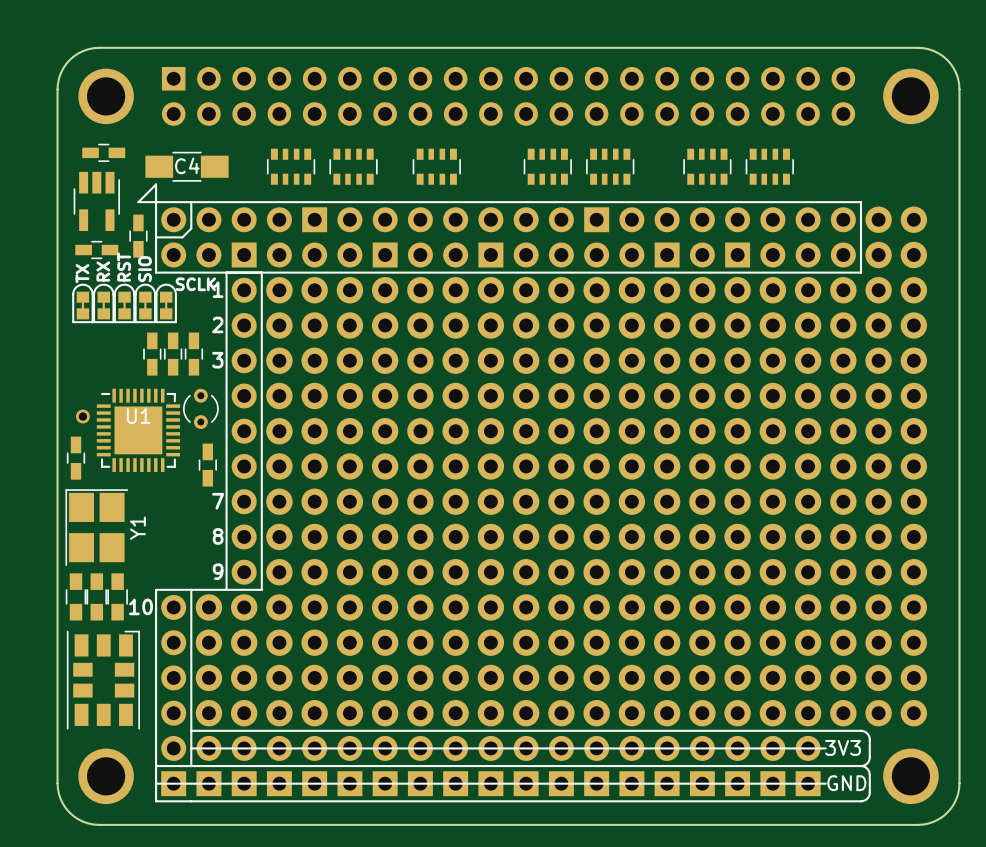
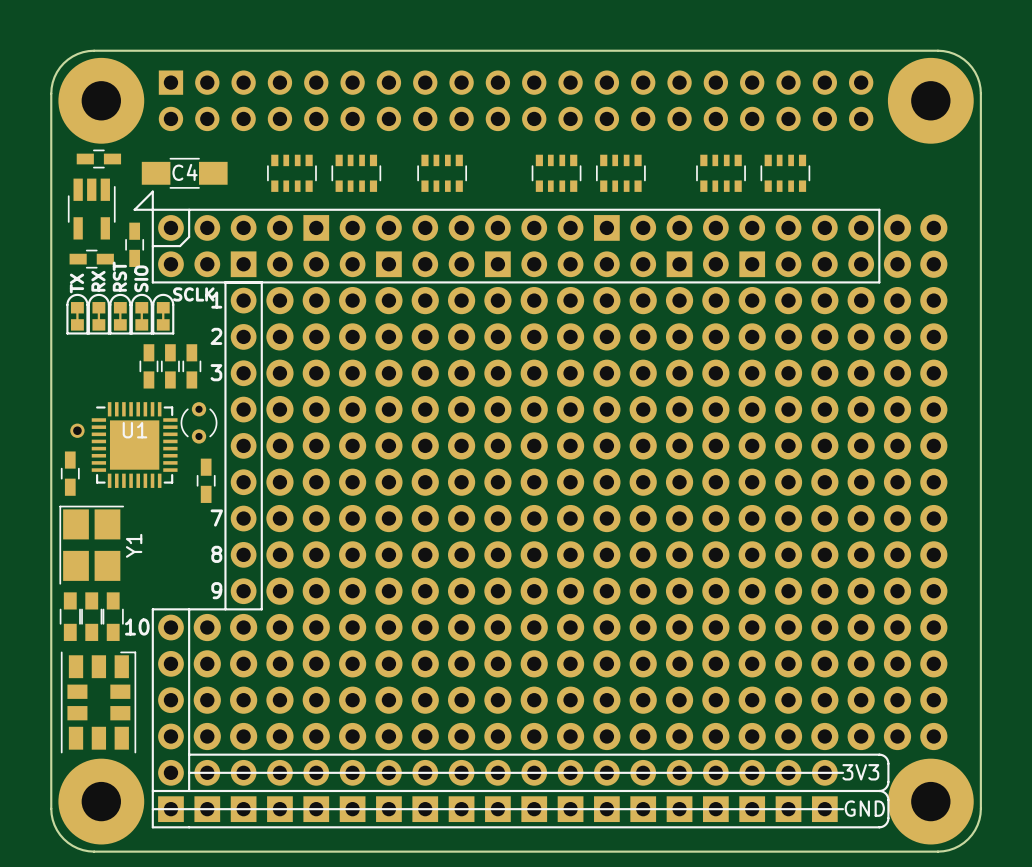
part footprint: [78, 68, 134, 125] -> [58, 57, 145, 144]
part footprint: [883, 68, 939, 125] -> [887, 57, 974, 144]
part footprint: [78, 748, 134, 805] -> [58, 758, 145, 845]
part footprint: [883, 748, 939, 805] -> [887, 758, 974, 845]

